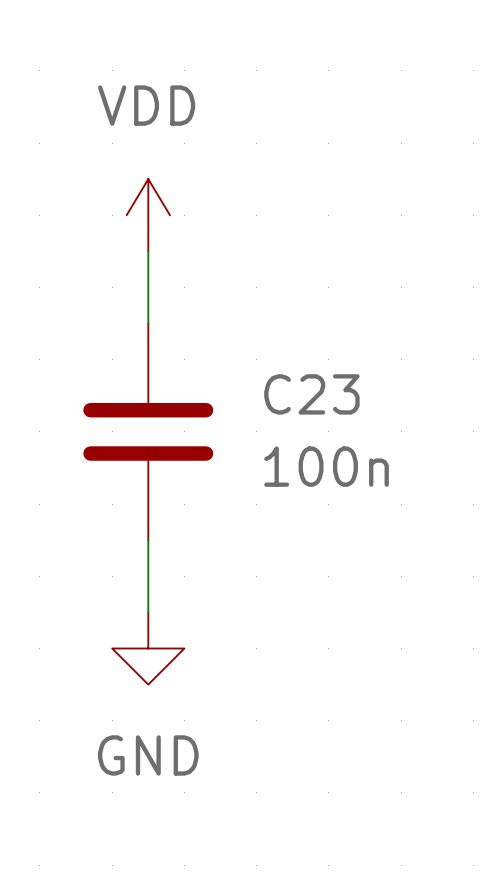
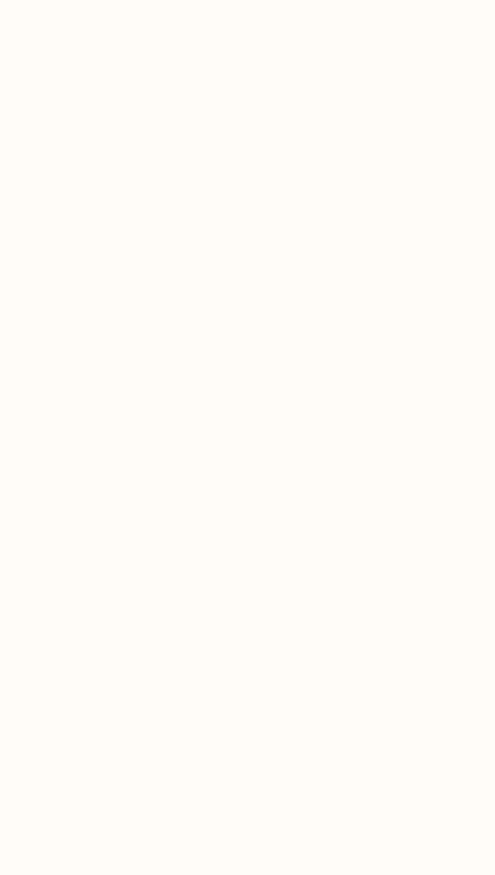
power symbol: VDD (148, 215) -> none
wire: (148, 251) (148, 323) -> none
C23: 100n (148, 431) -> none
wire: (148, 540) (148, 612) -> none
power symbol: GND (148, 648) -> none

